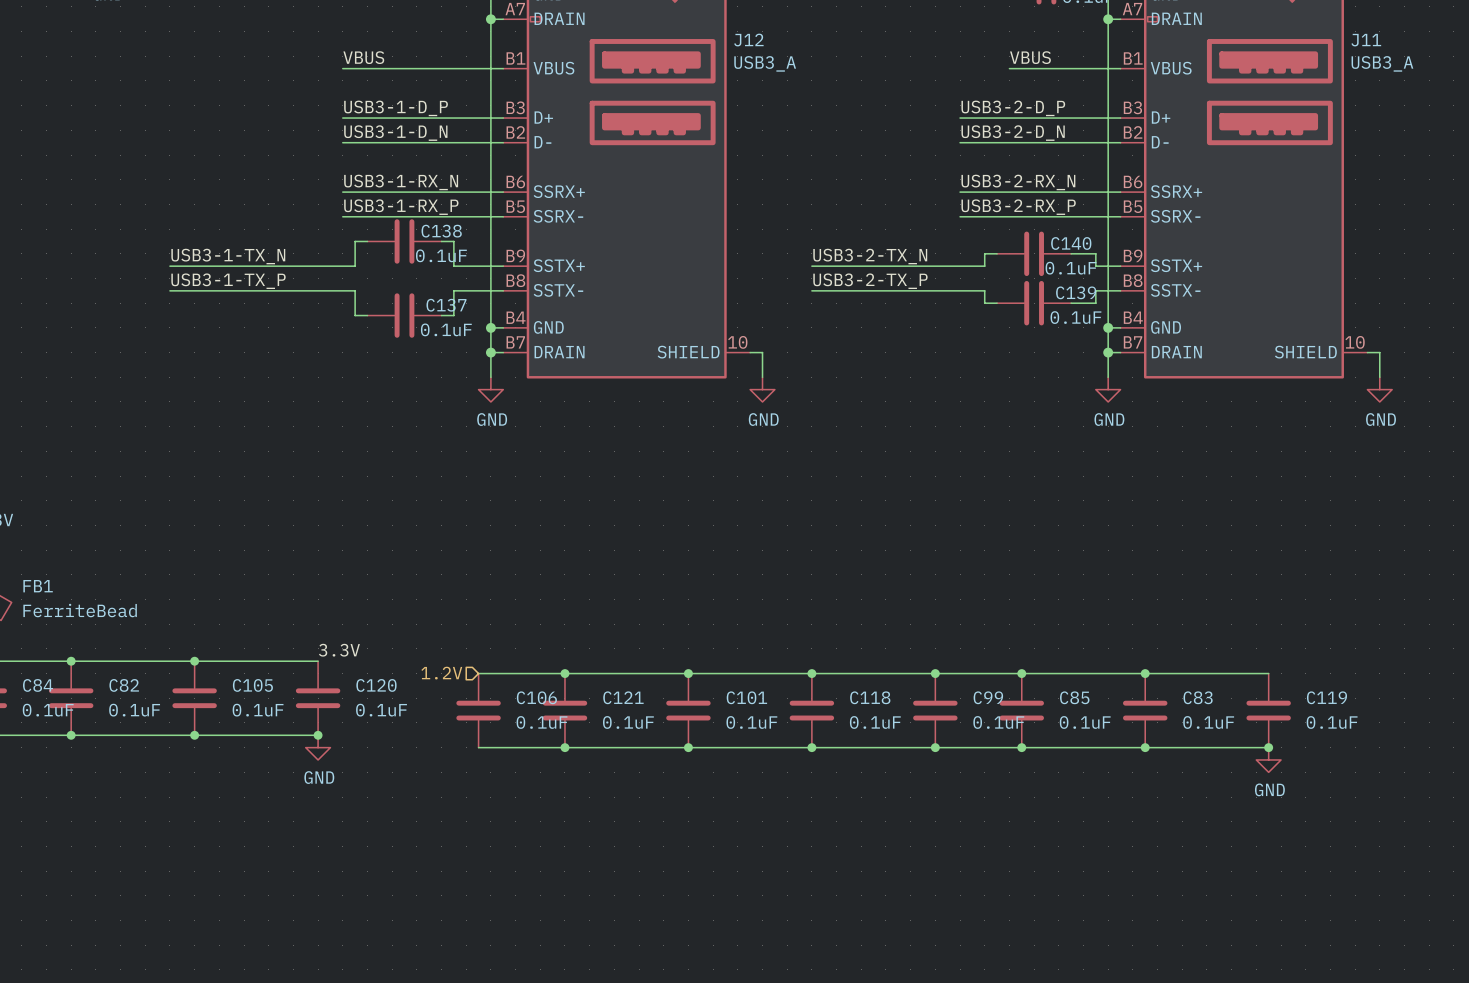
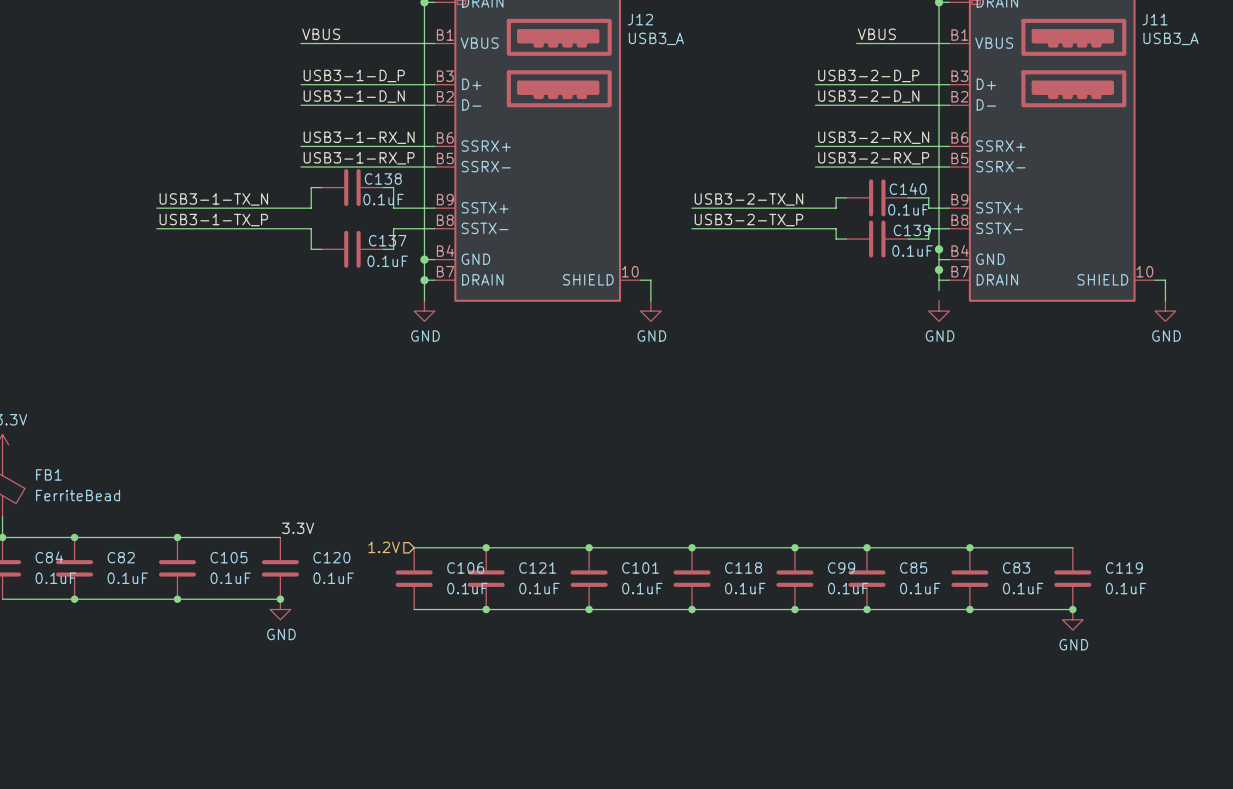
junction: none -> (939, 249)
junction: (1108, 327) -> none
junction: none -> (939, 269)
junction: (1108, 352) -> none
wire: (1108, 364) (1108, 377) -> none

